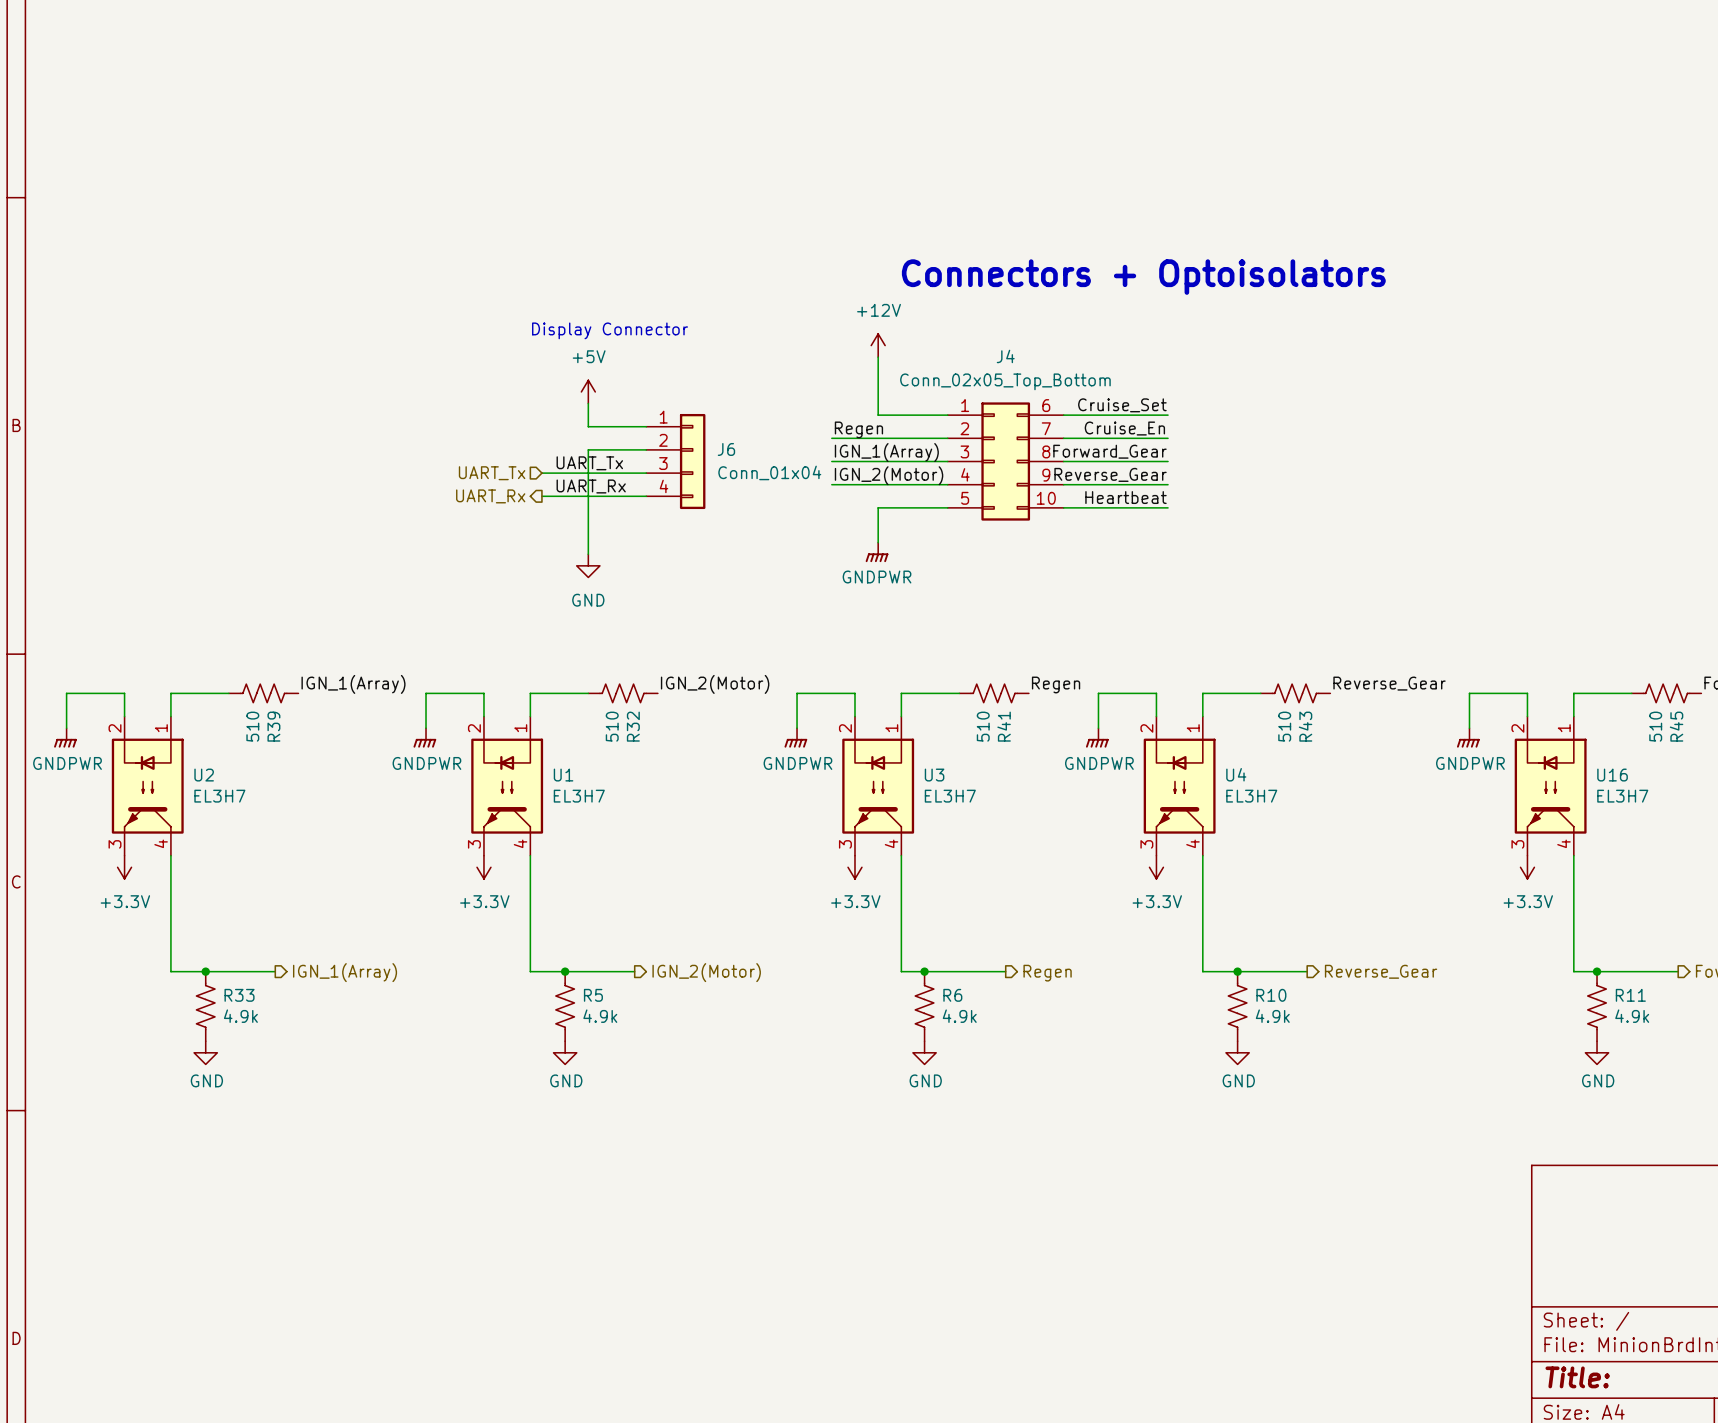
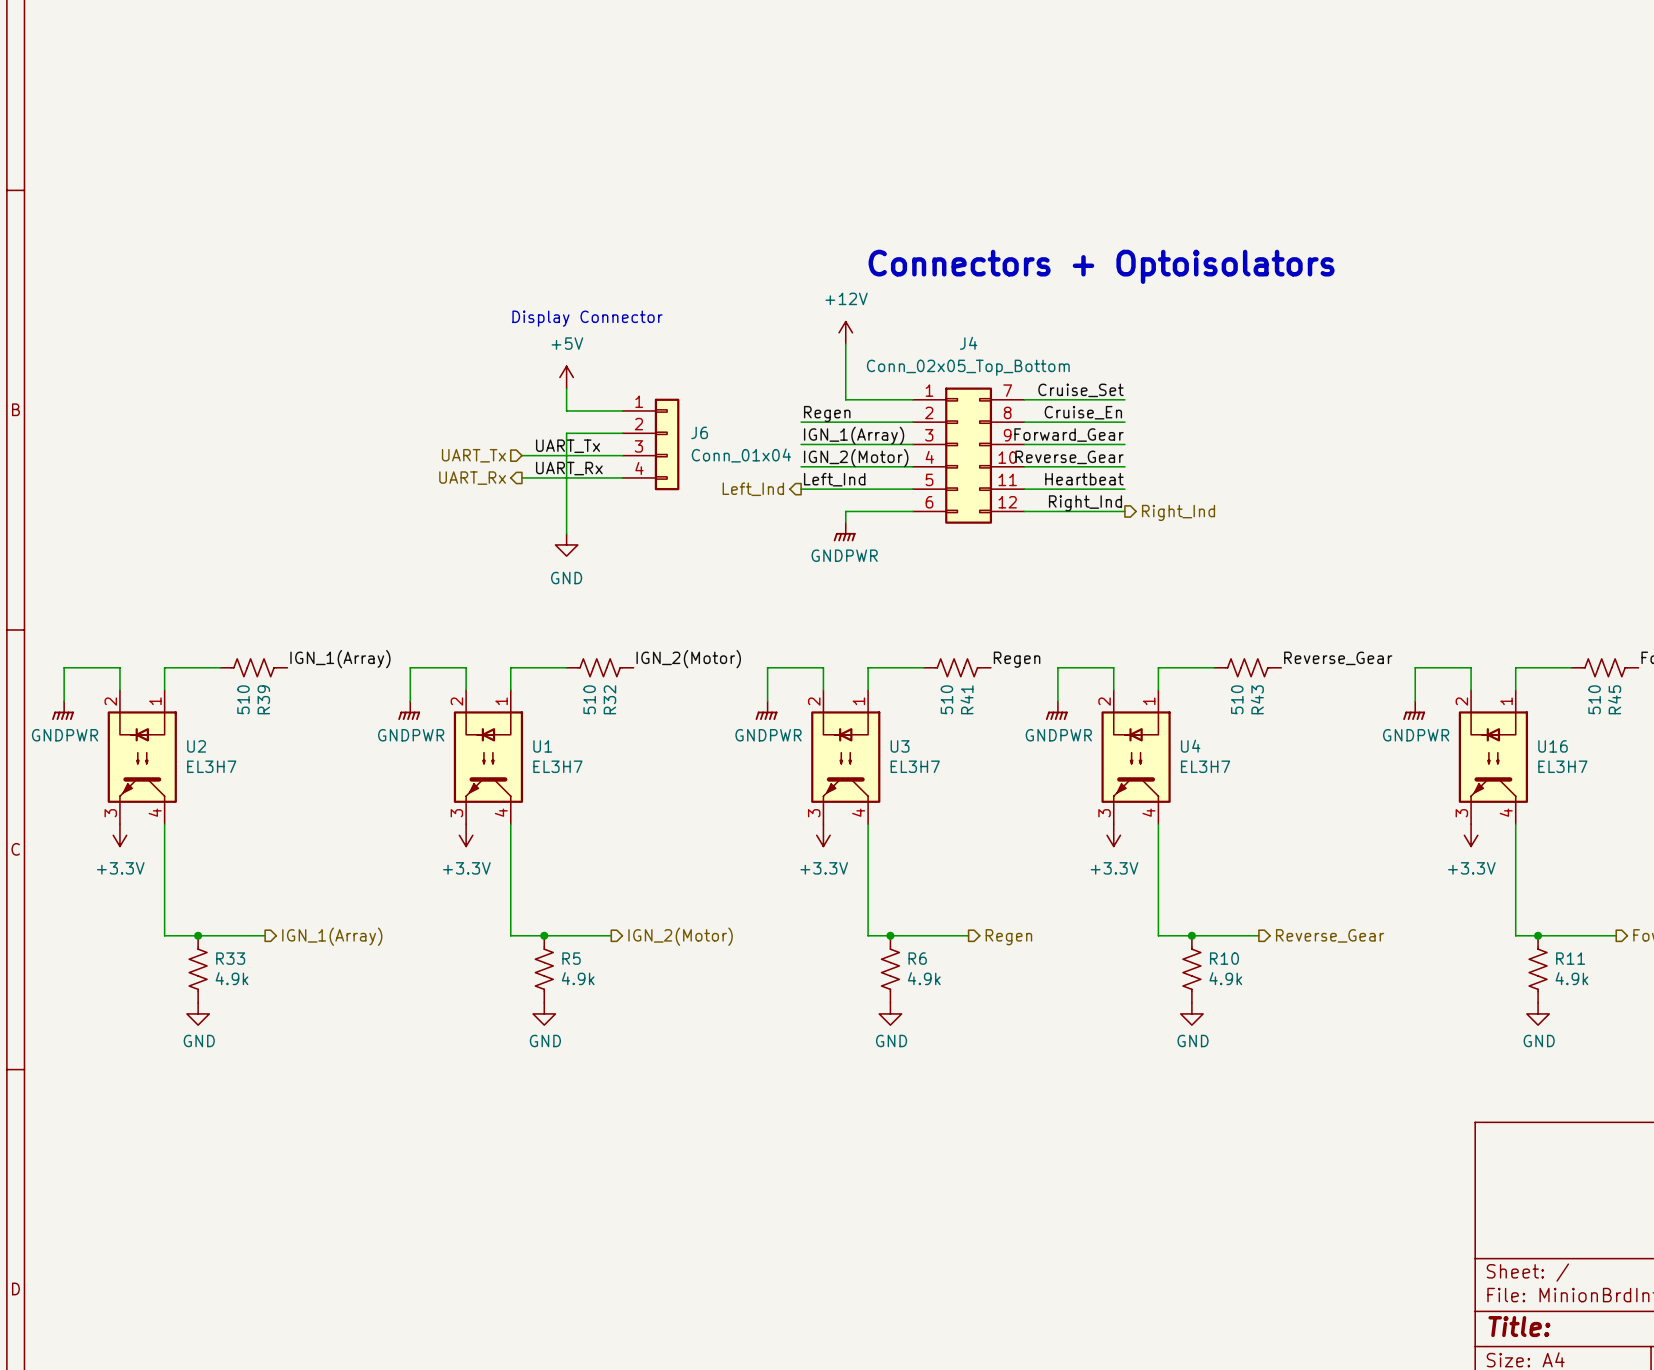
J4 symbol: [947, 402, 1064, 521] -> [912, 387, 1025, 524]
label: none -> Left_Ind (834, 479)
wire: (878, 507) (878, 531) -> (845, 489) (801, 489)
hierarchical label: none -> Left_Ind (753, 489)
label: none -> Right_Ind (1085, 503)
wire: none -> (845, 511) (912, 511)
wire: none -> (1024, 511) (1124, 511)
hierarchical label: none -> Right_Ind (1178, 512)

